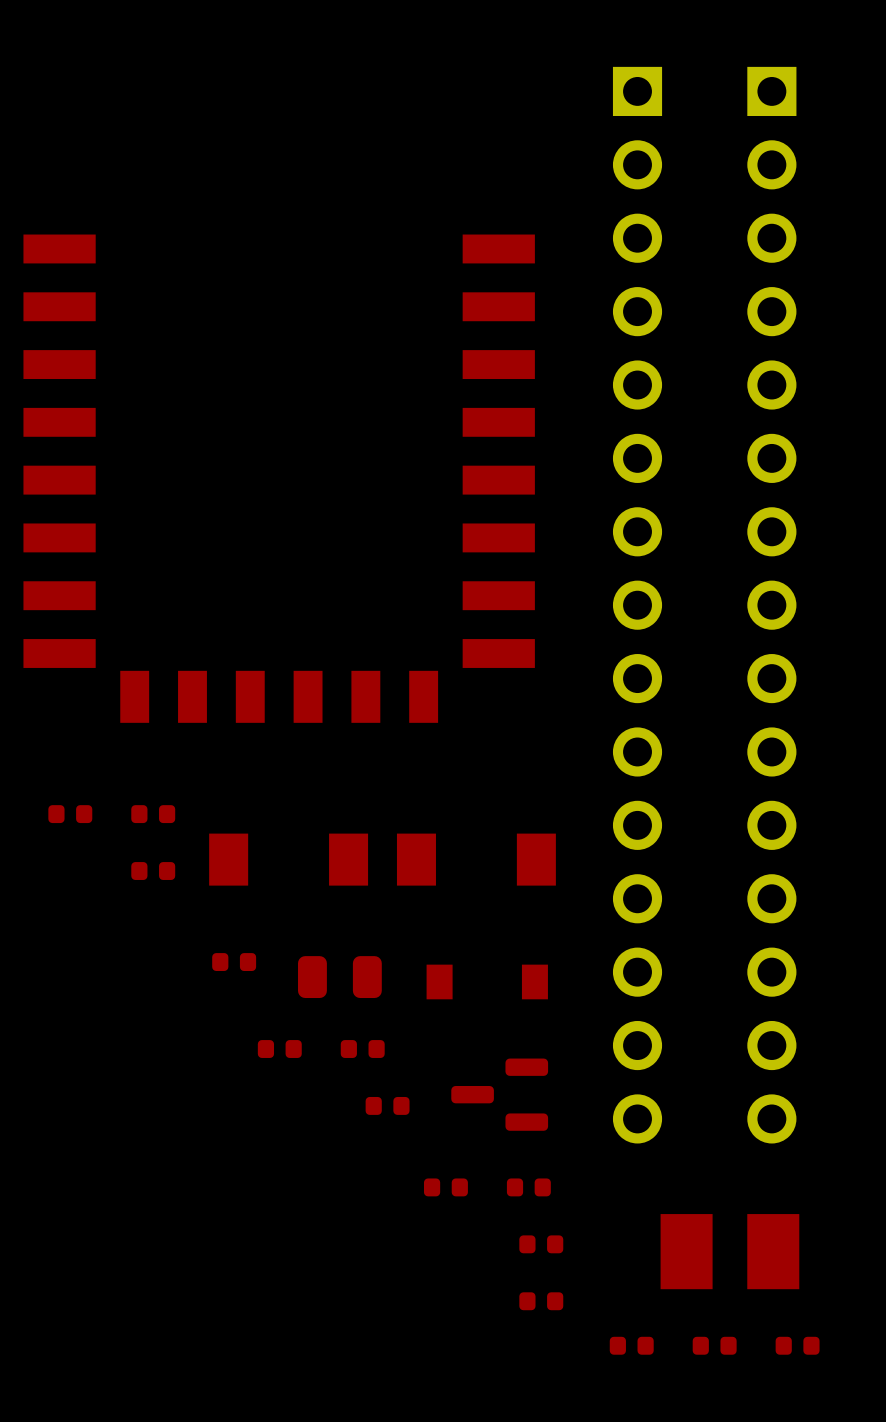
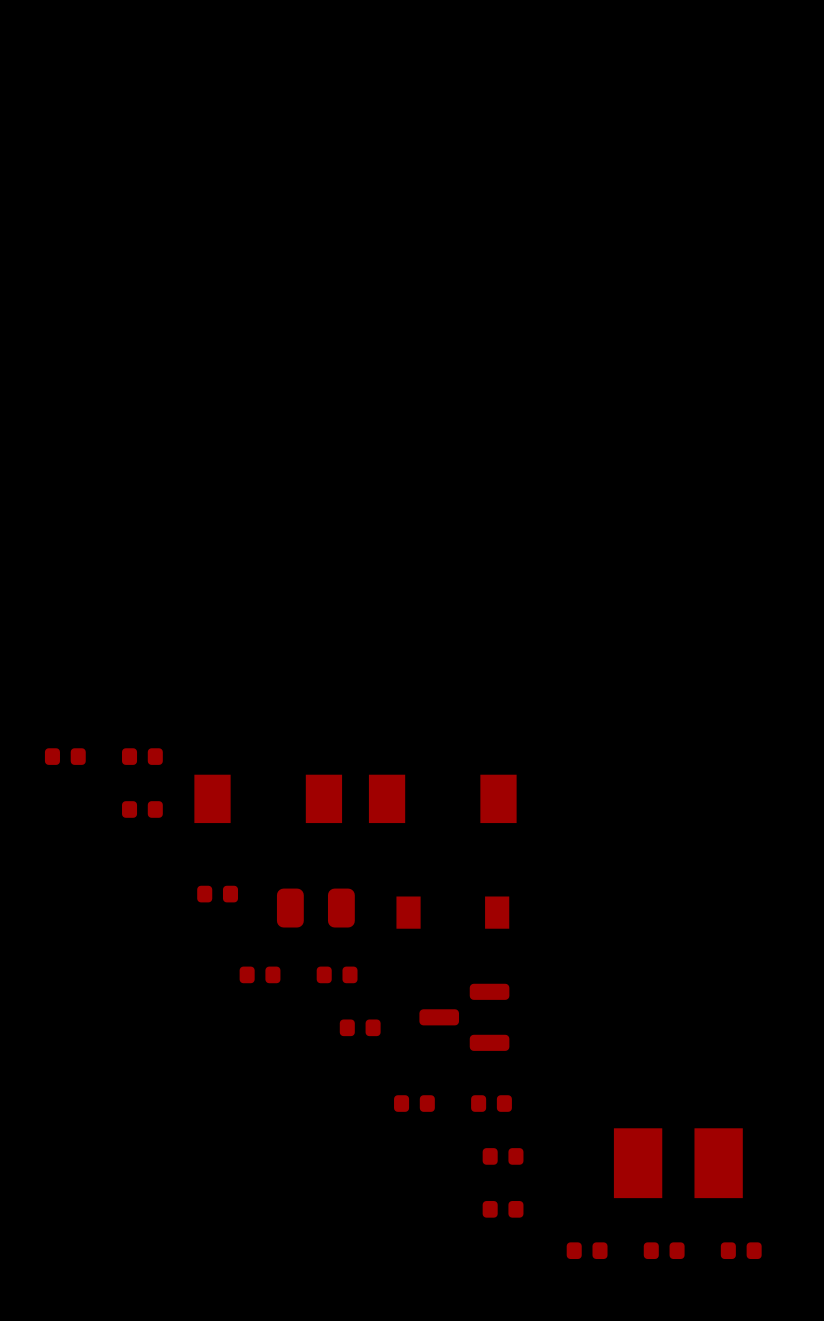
part: (279, 478) -> none
part: (637, 605) -> none
part: (771, 605) -> none

